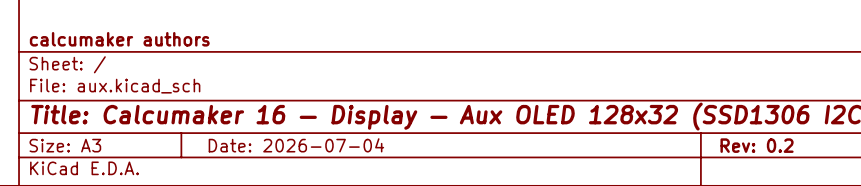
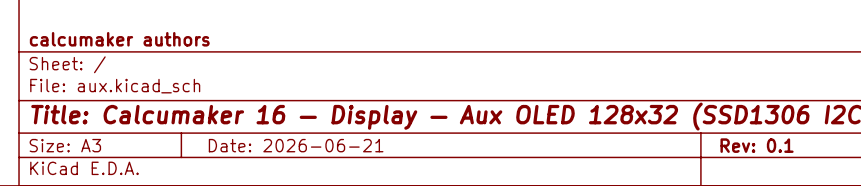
title block: Date: 2026-07-04 (296, 145) -> Date: 2026-06-21 (296, 145)
title block: Rev: 0.2 (757, 145) -> Rev: 0.1 (757, 145)

